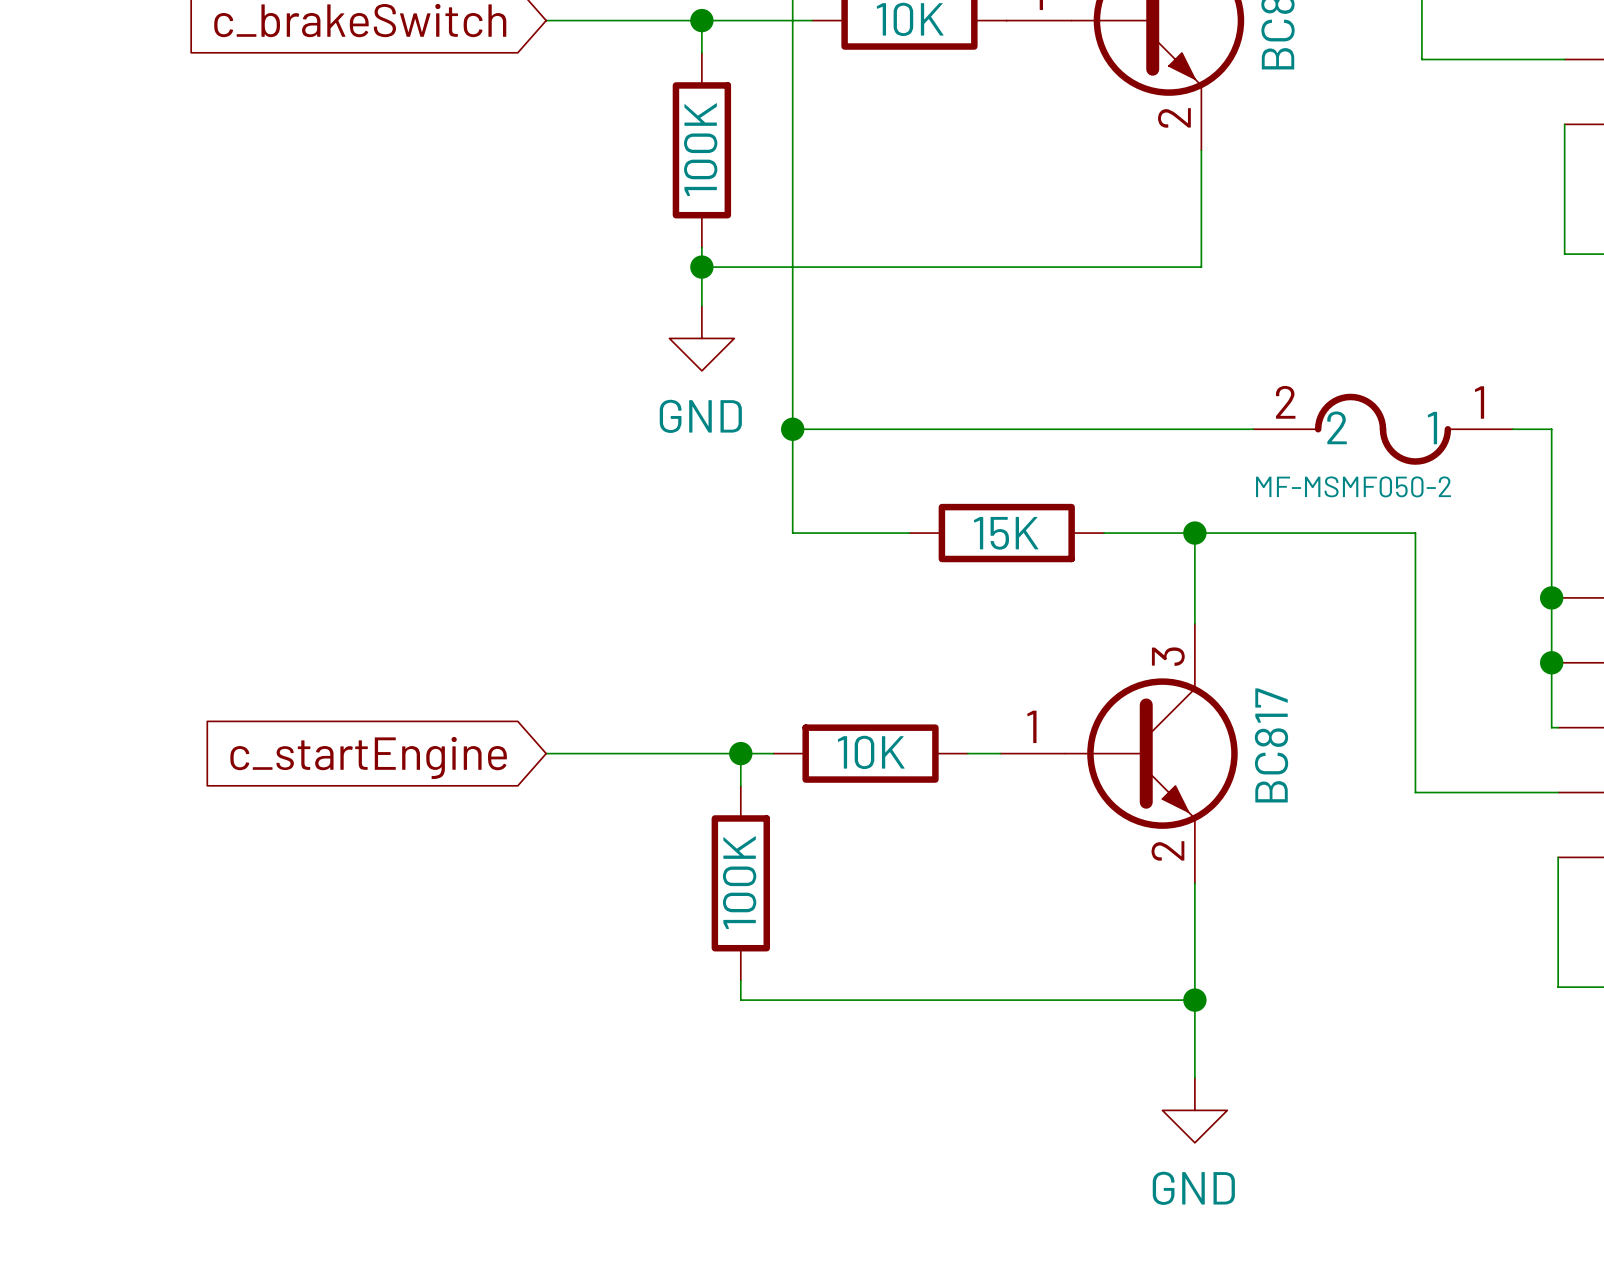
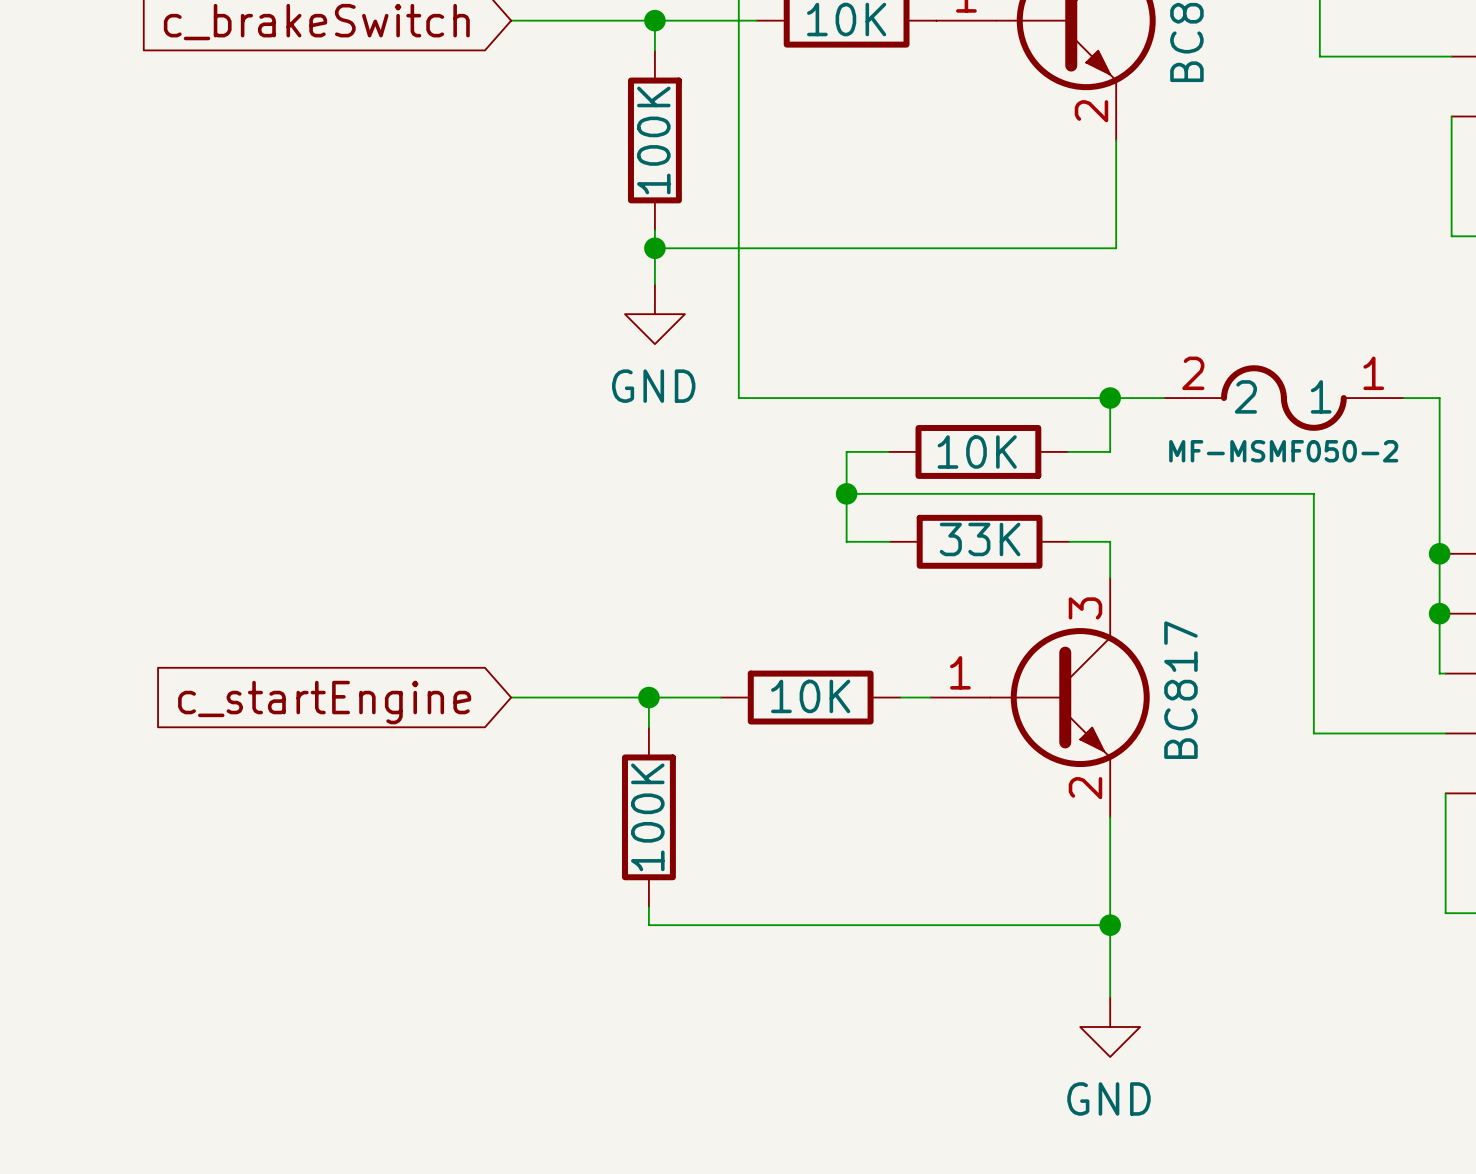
wire: (792, 429) (792, 533) (909, 533) -> (1026, 493) (846, 493)
junction: (792, 429) -> none
wire: none -> (1110, 398) (1110, 451) (1068, 451)
wire: none -> (888, 451) (846, 451) (846, 541) (889, 541)
part: none -> 10K (978, 451)
junction: none -> (846, 493)
part: 15K (1006, 533) -> none
wire: (1194, 533) (1194, 584) -> (1069, 541) (1110, 541)
junction position: (1194, 533) -> (1110, 398)
part: none -> 33K (979, 541)
wire: (740, 753) (740, 786) -> (648, 697) (648, 727)
junction position: (740, 753) -> (648, 697)
part position: (740, 883) -> (648, 817)
wire: (740, 980) (740, 1000) -> (648, 907) (648, 925) (690, 925)

